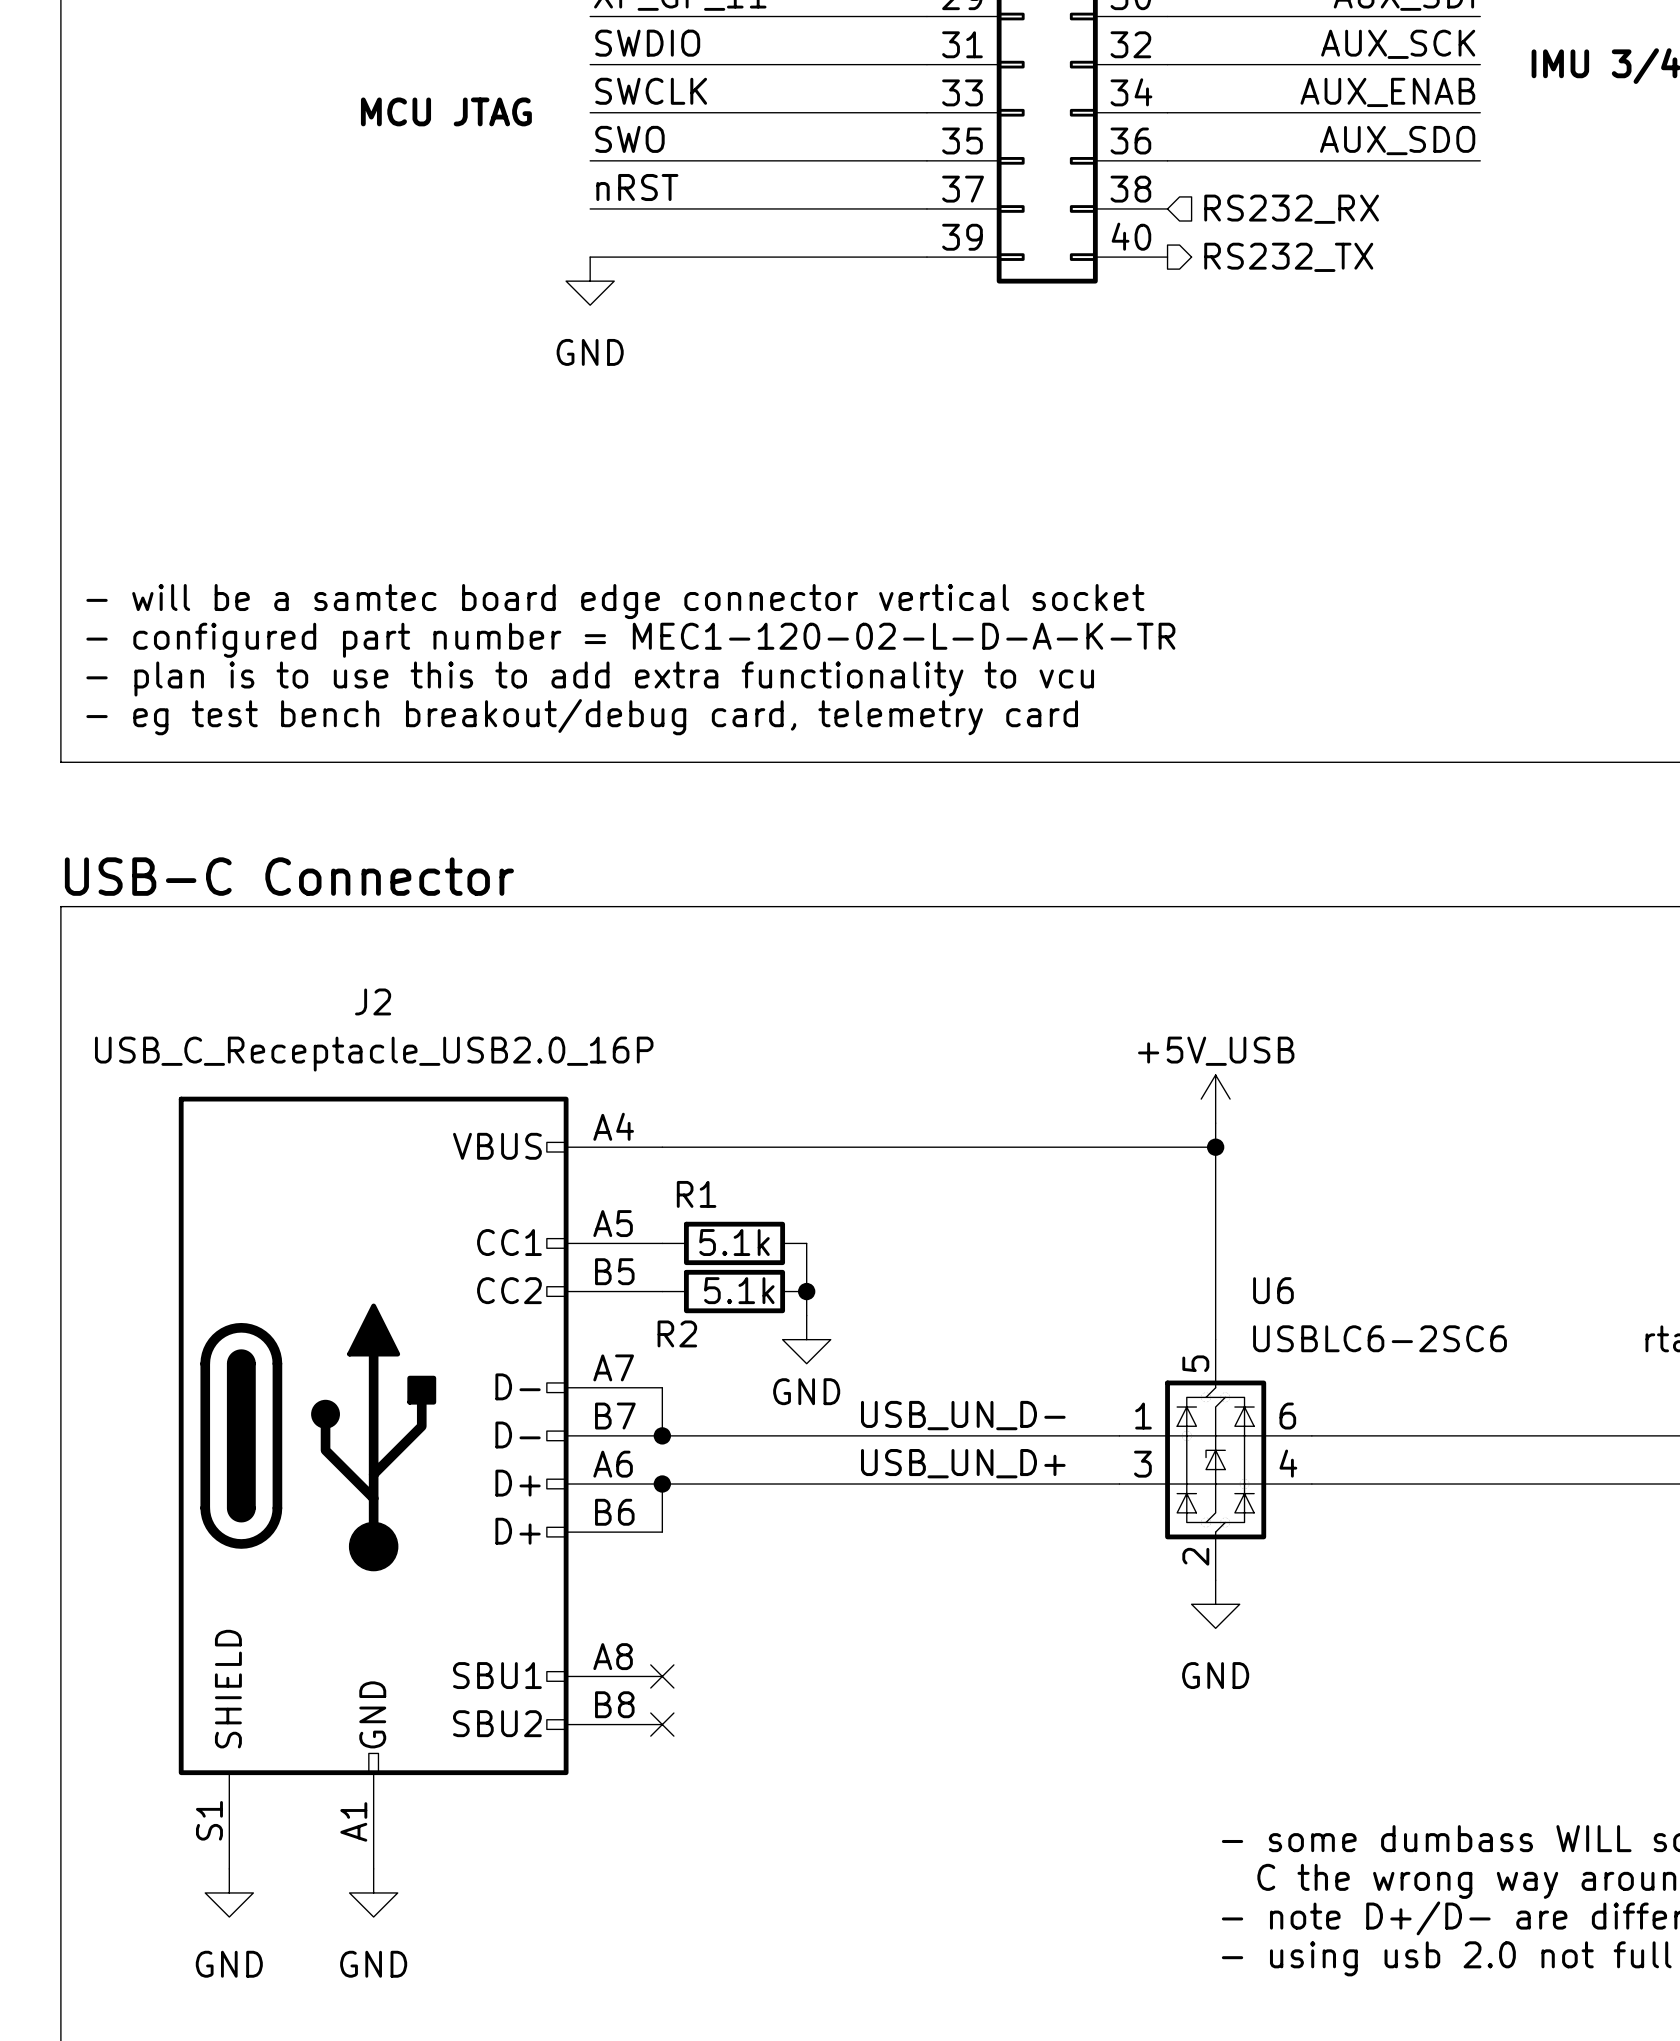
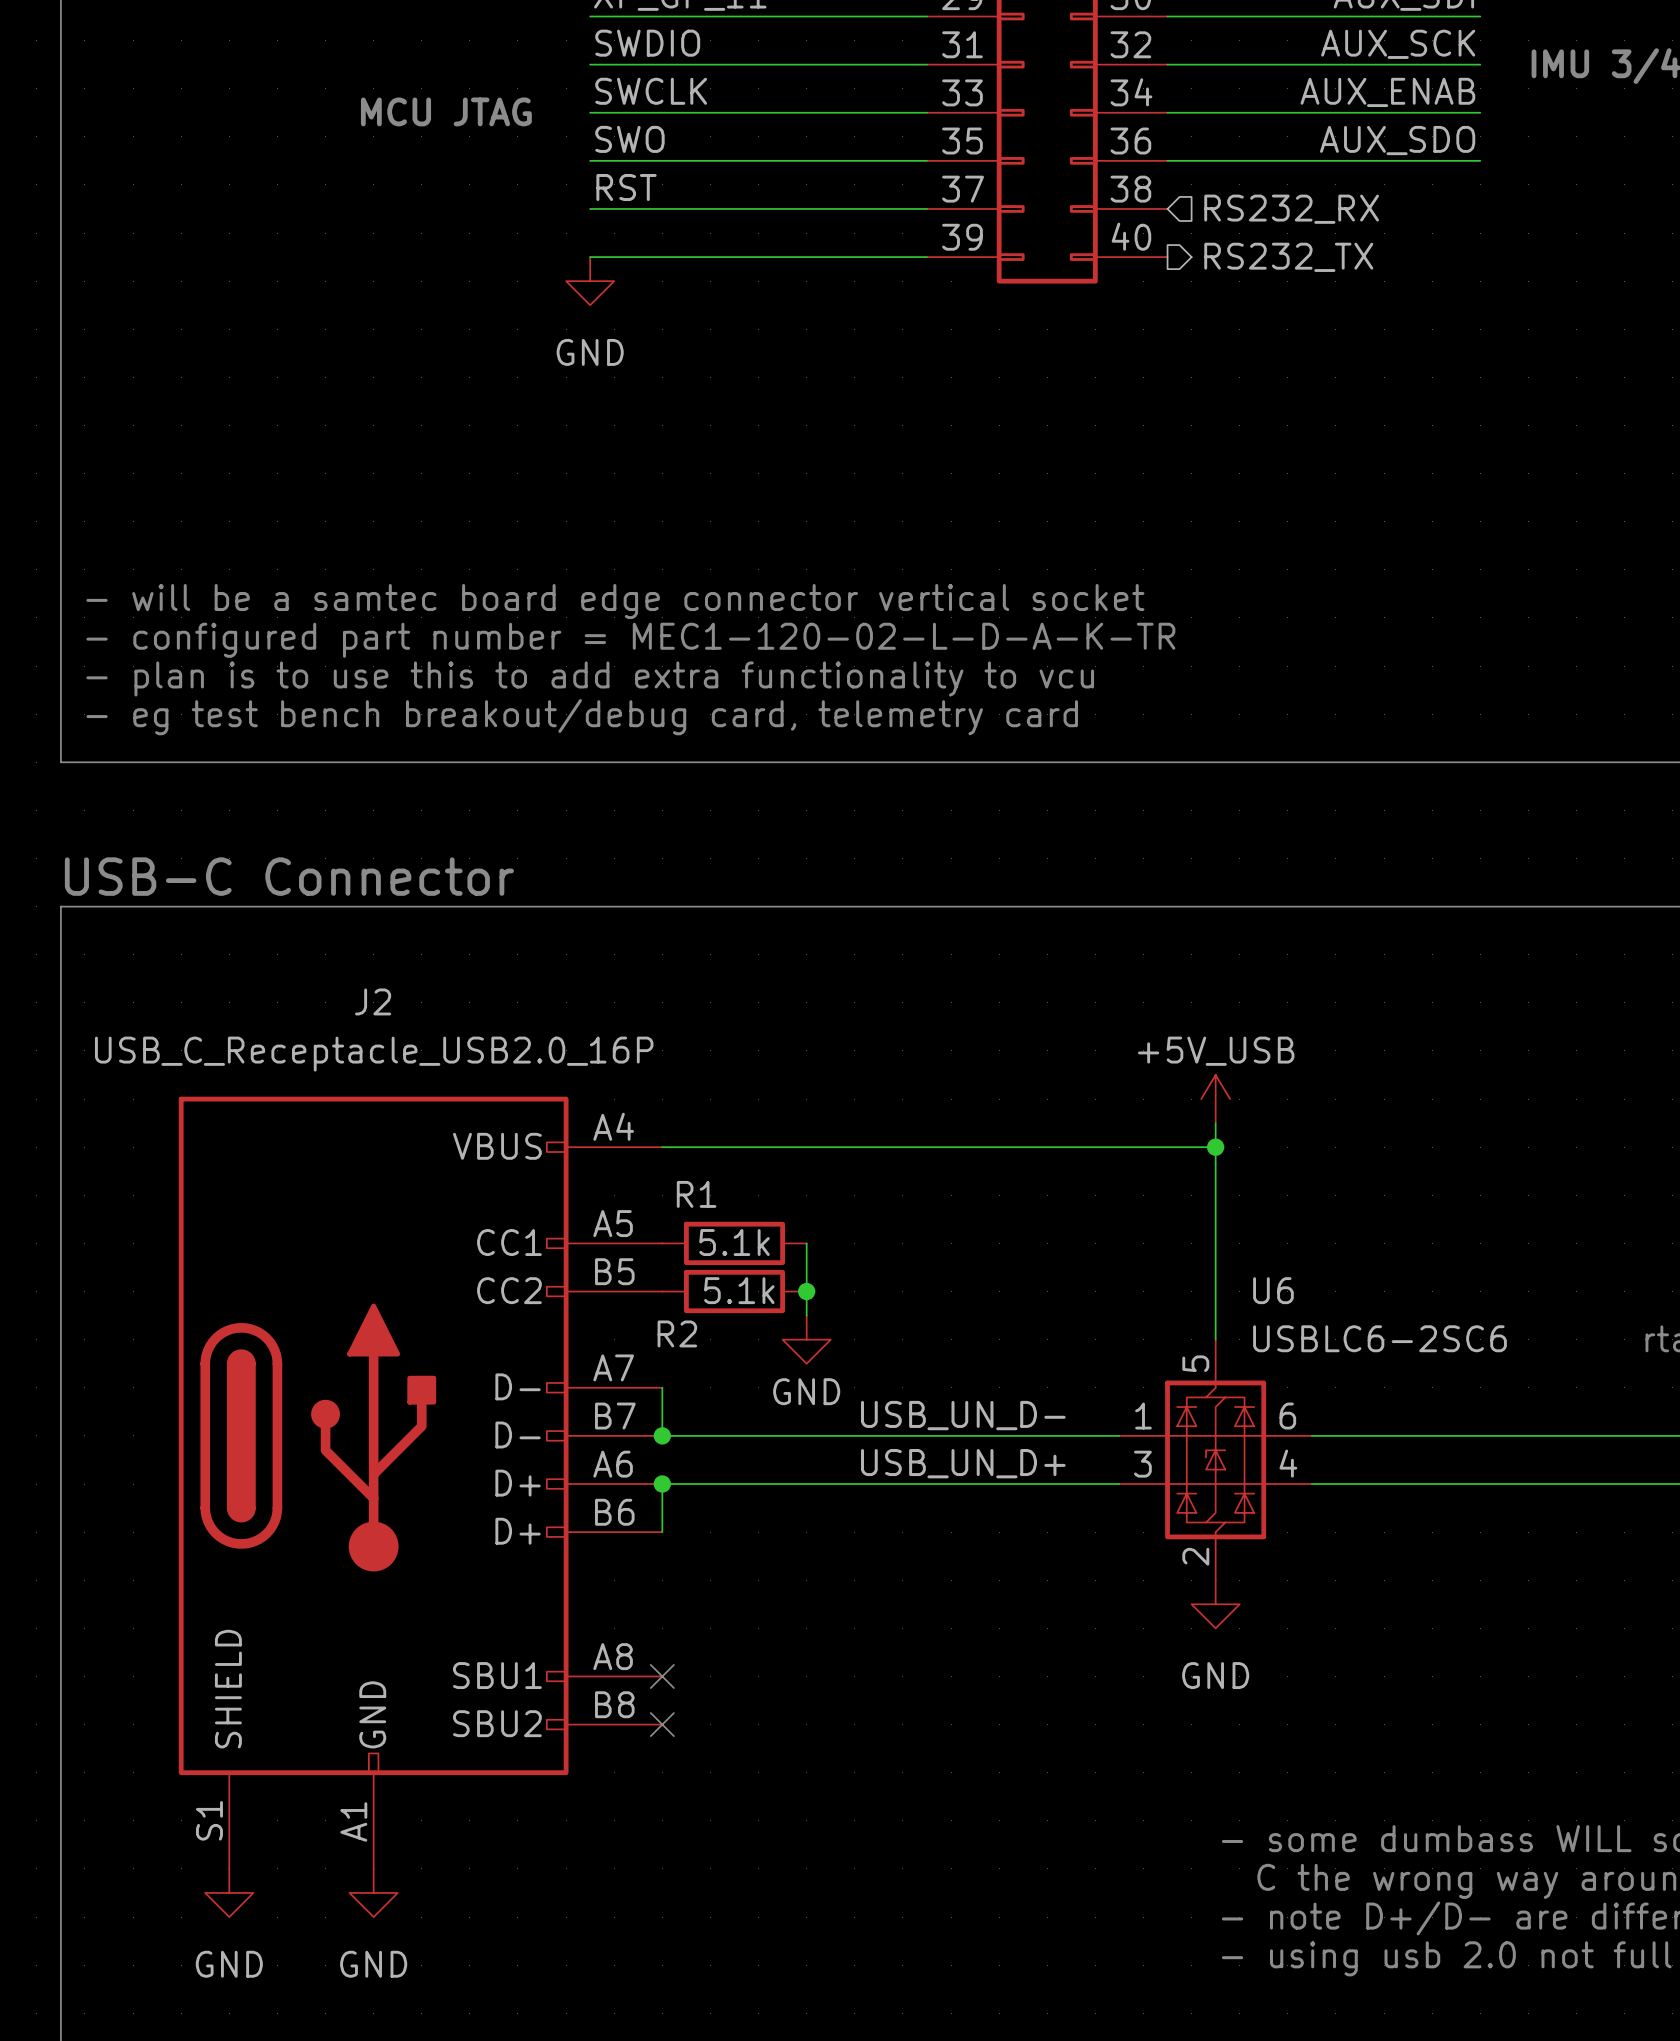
label: nRST (637, 187) -> RST (626, 187)

